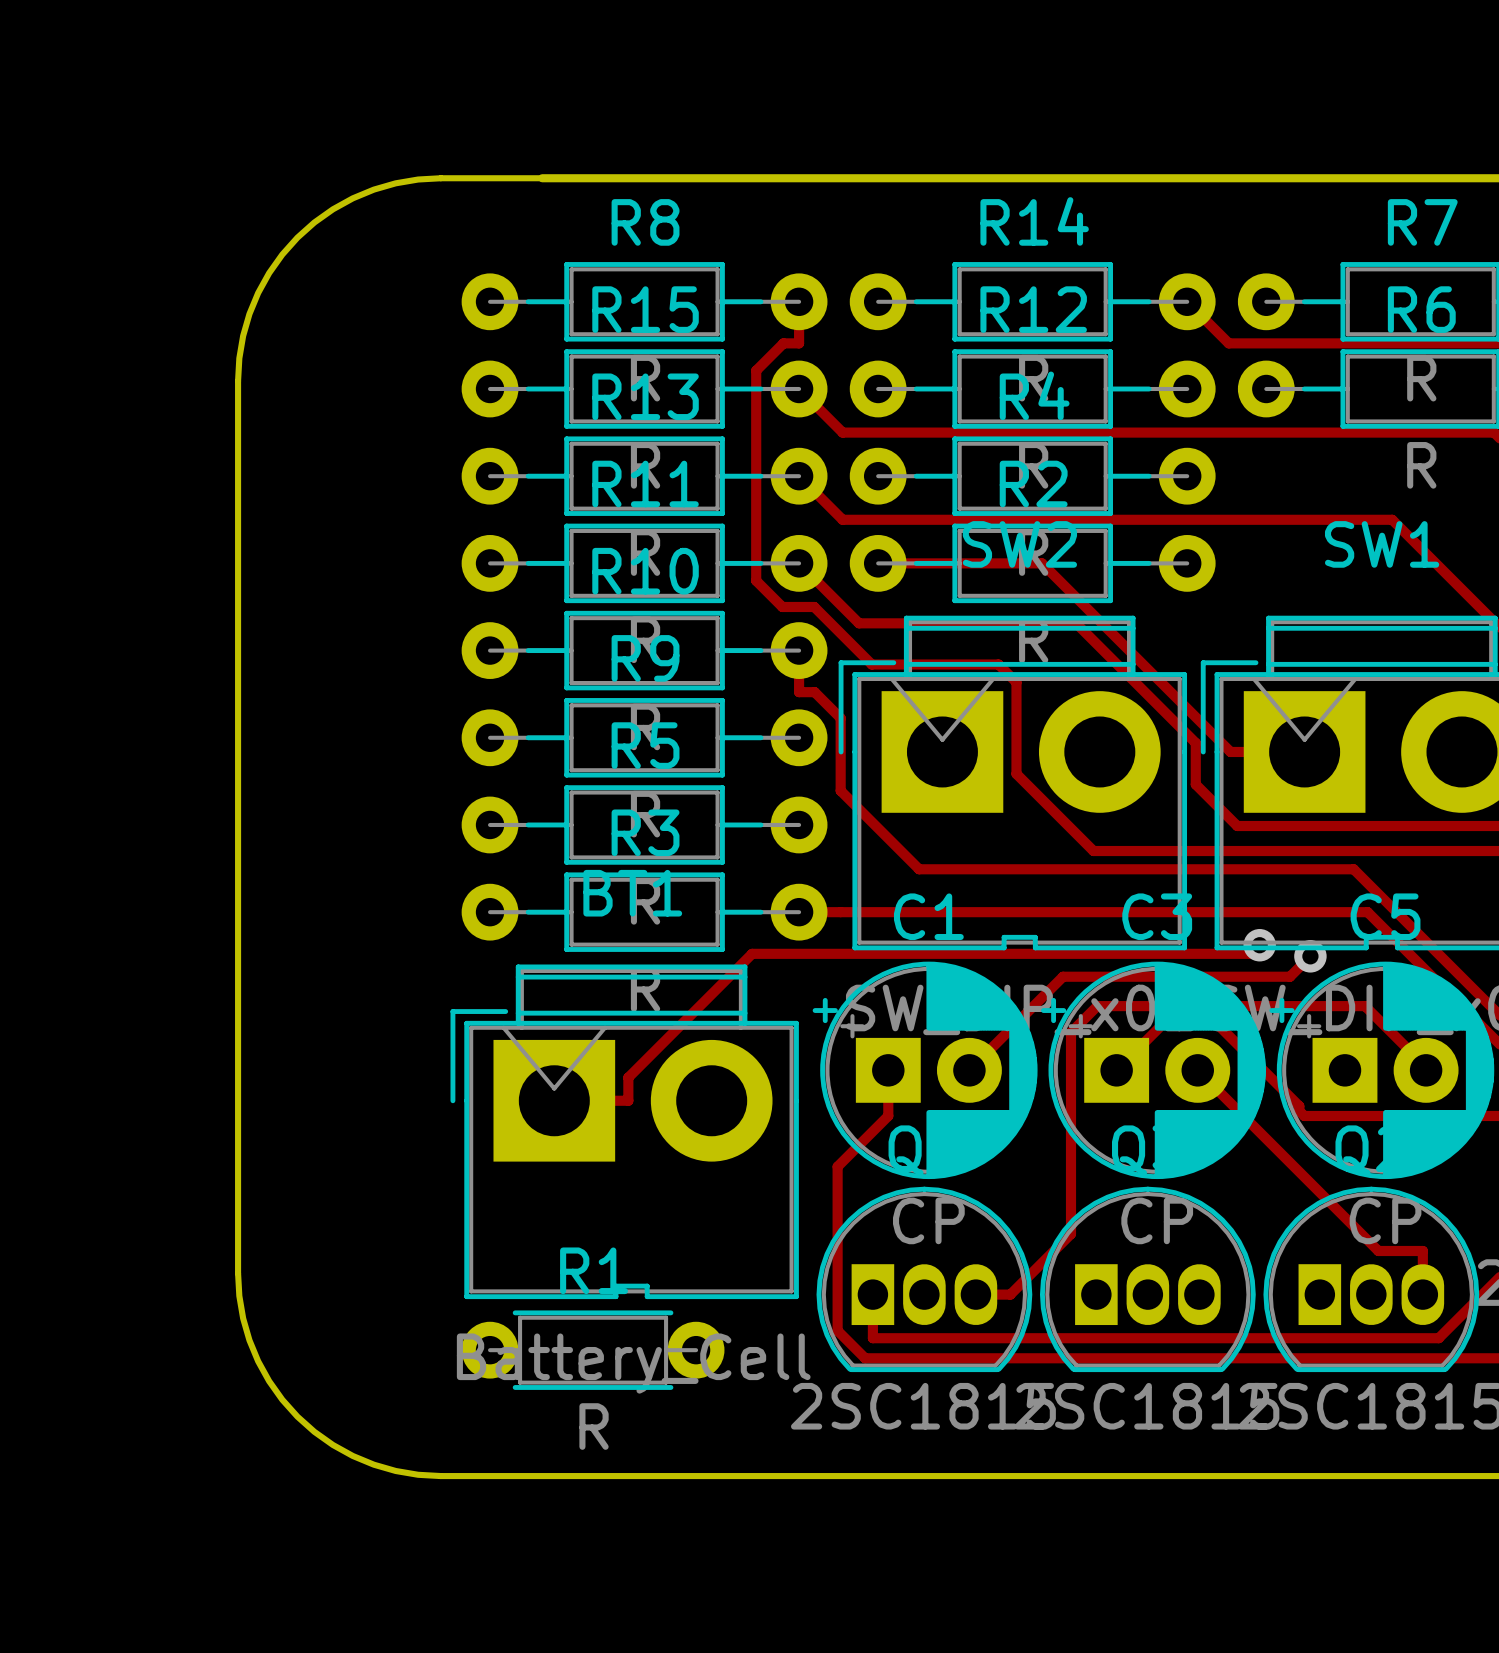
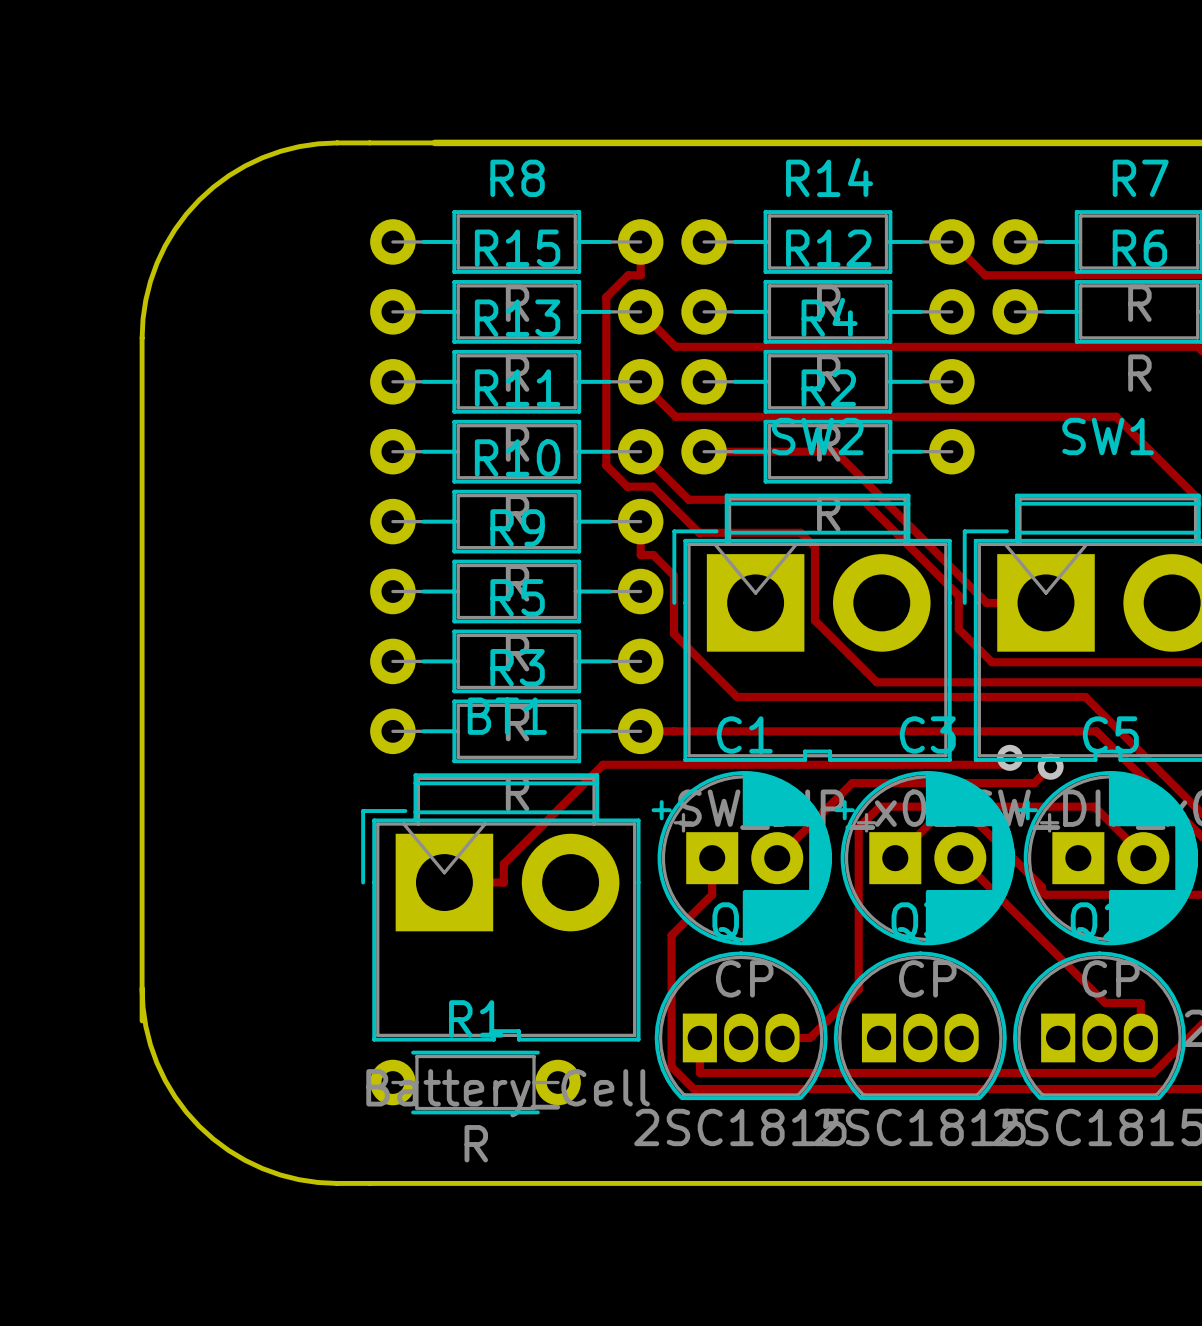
board edge: (440, 178) (418, 179) (373, 189) (332, 209) (297, 237) (269, 273) (249, 314) (239, 358) (238, 381) (238, 1273) (243, 1318) (249, 1340) (269, 1381) (297, 1416) (314, 1431) (332, 1444) (373, 1464) (418, 1474) (440, 1476) -> (353, 142) (318, 143) (280, 151) (245, 165) (213, 187) (199, 200) (174, 229) (156, 263) (145, 299) (142, 338) (142, 1020)
board edge: none -> (142, 988) (145, 1026) (156, 1063) (174, 1096) (199, 1126) (228, 1150) (262, 1168) (299, 1179) (353, 1183)

